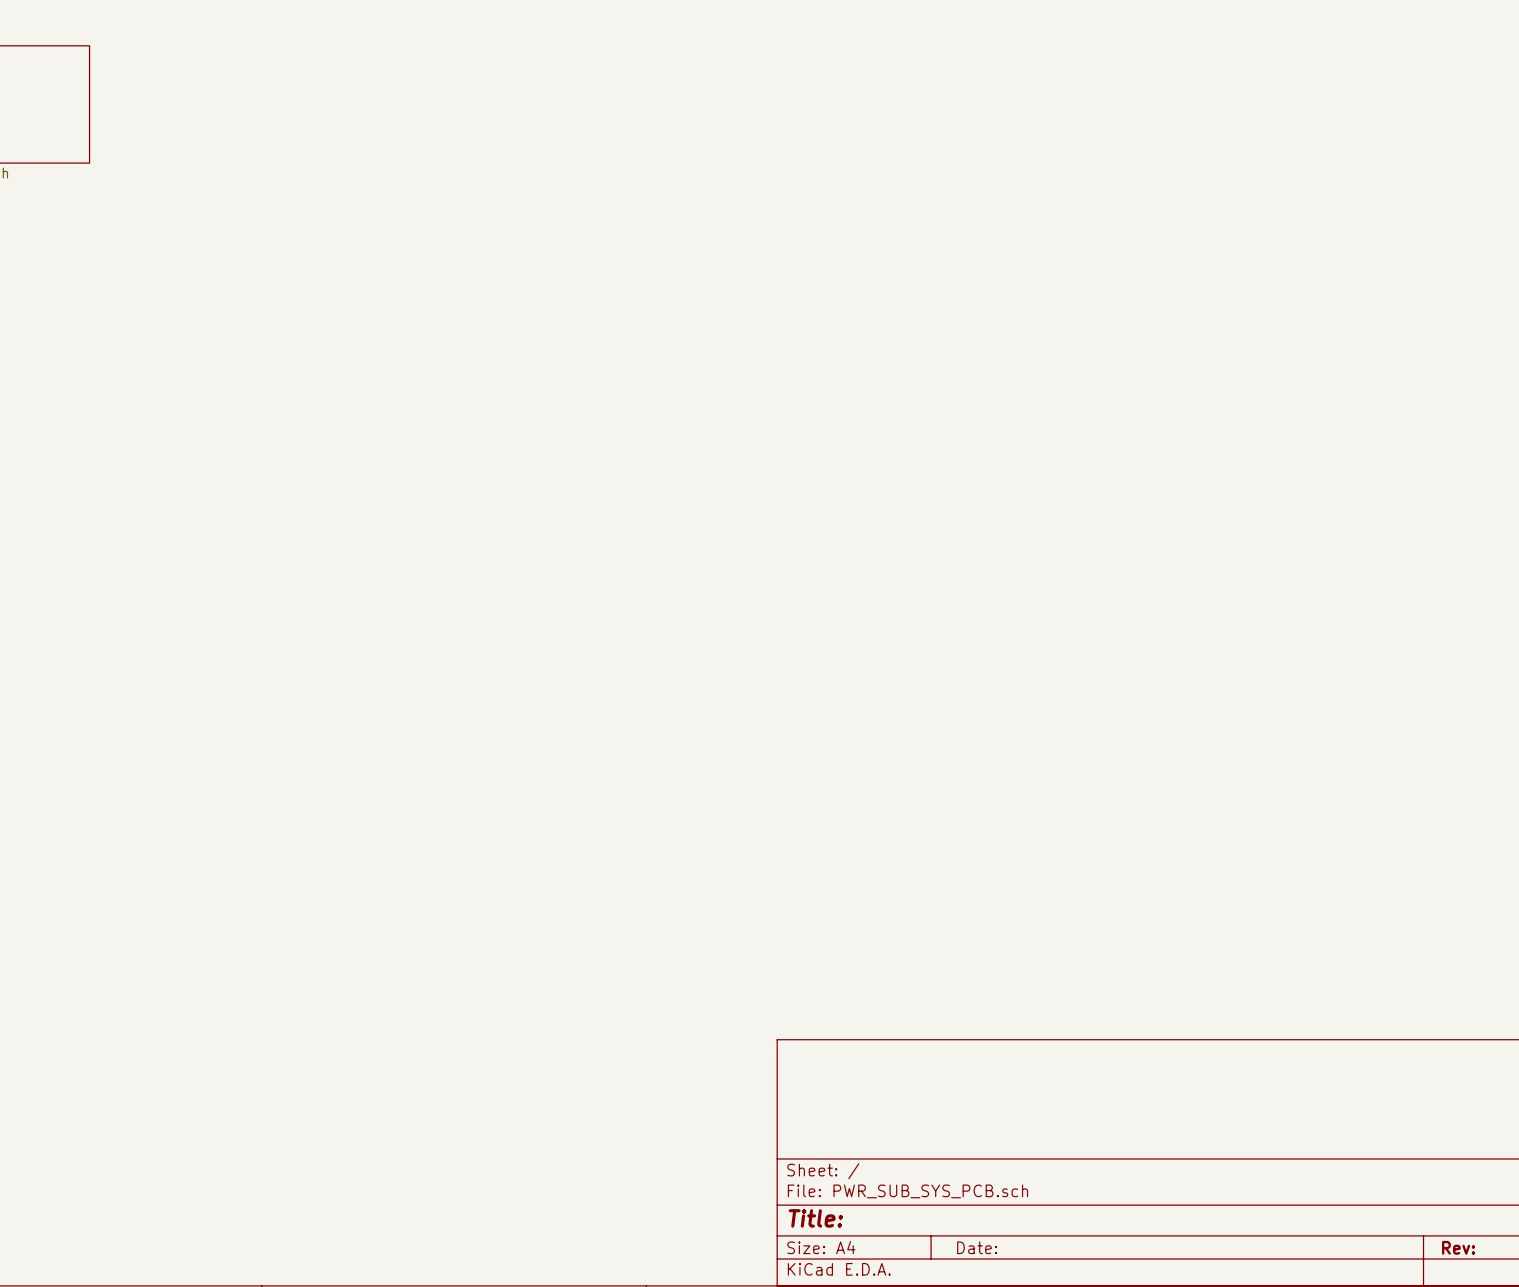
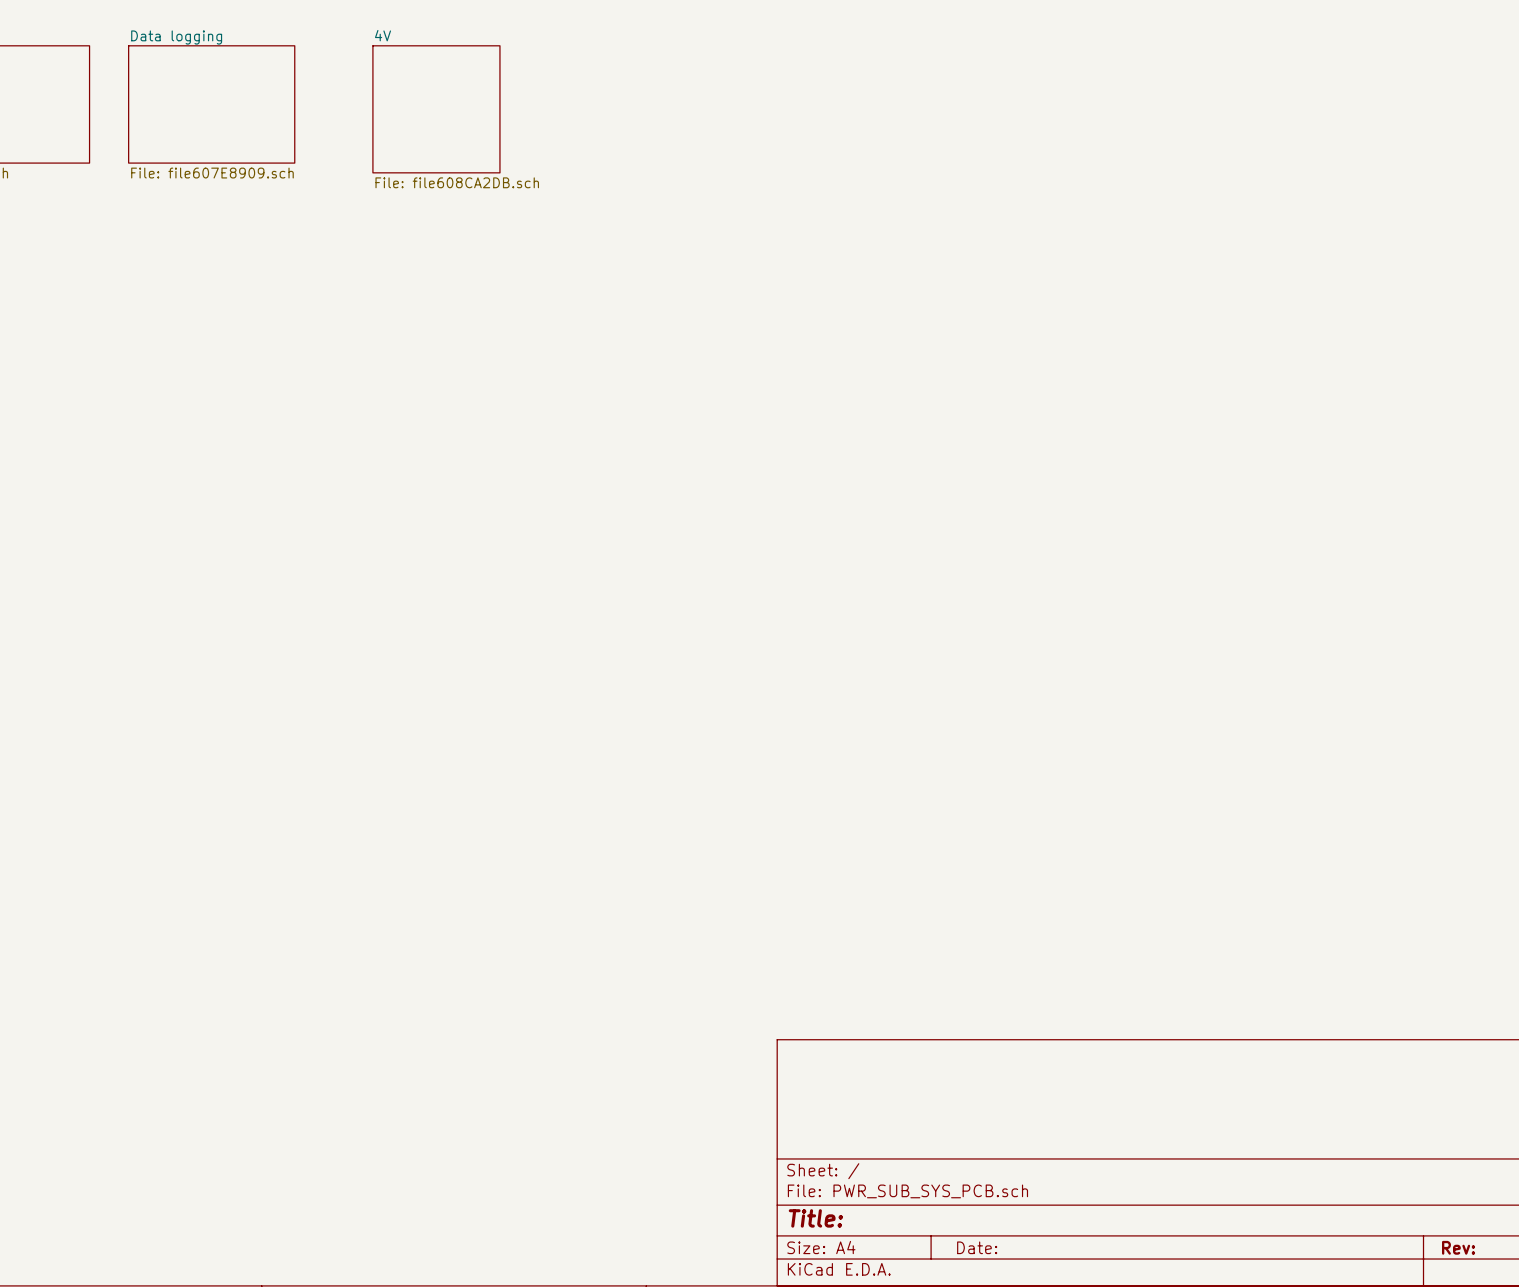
sheet Data logging: none -> File: file607E8909.sch (211, 104)
sheet 4V: none -> File: file608CA2DB.sch (436, 109)

